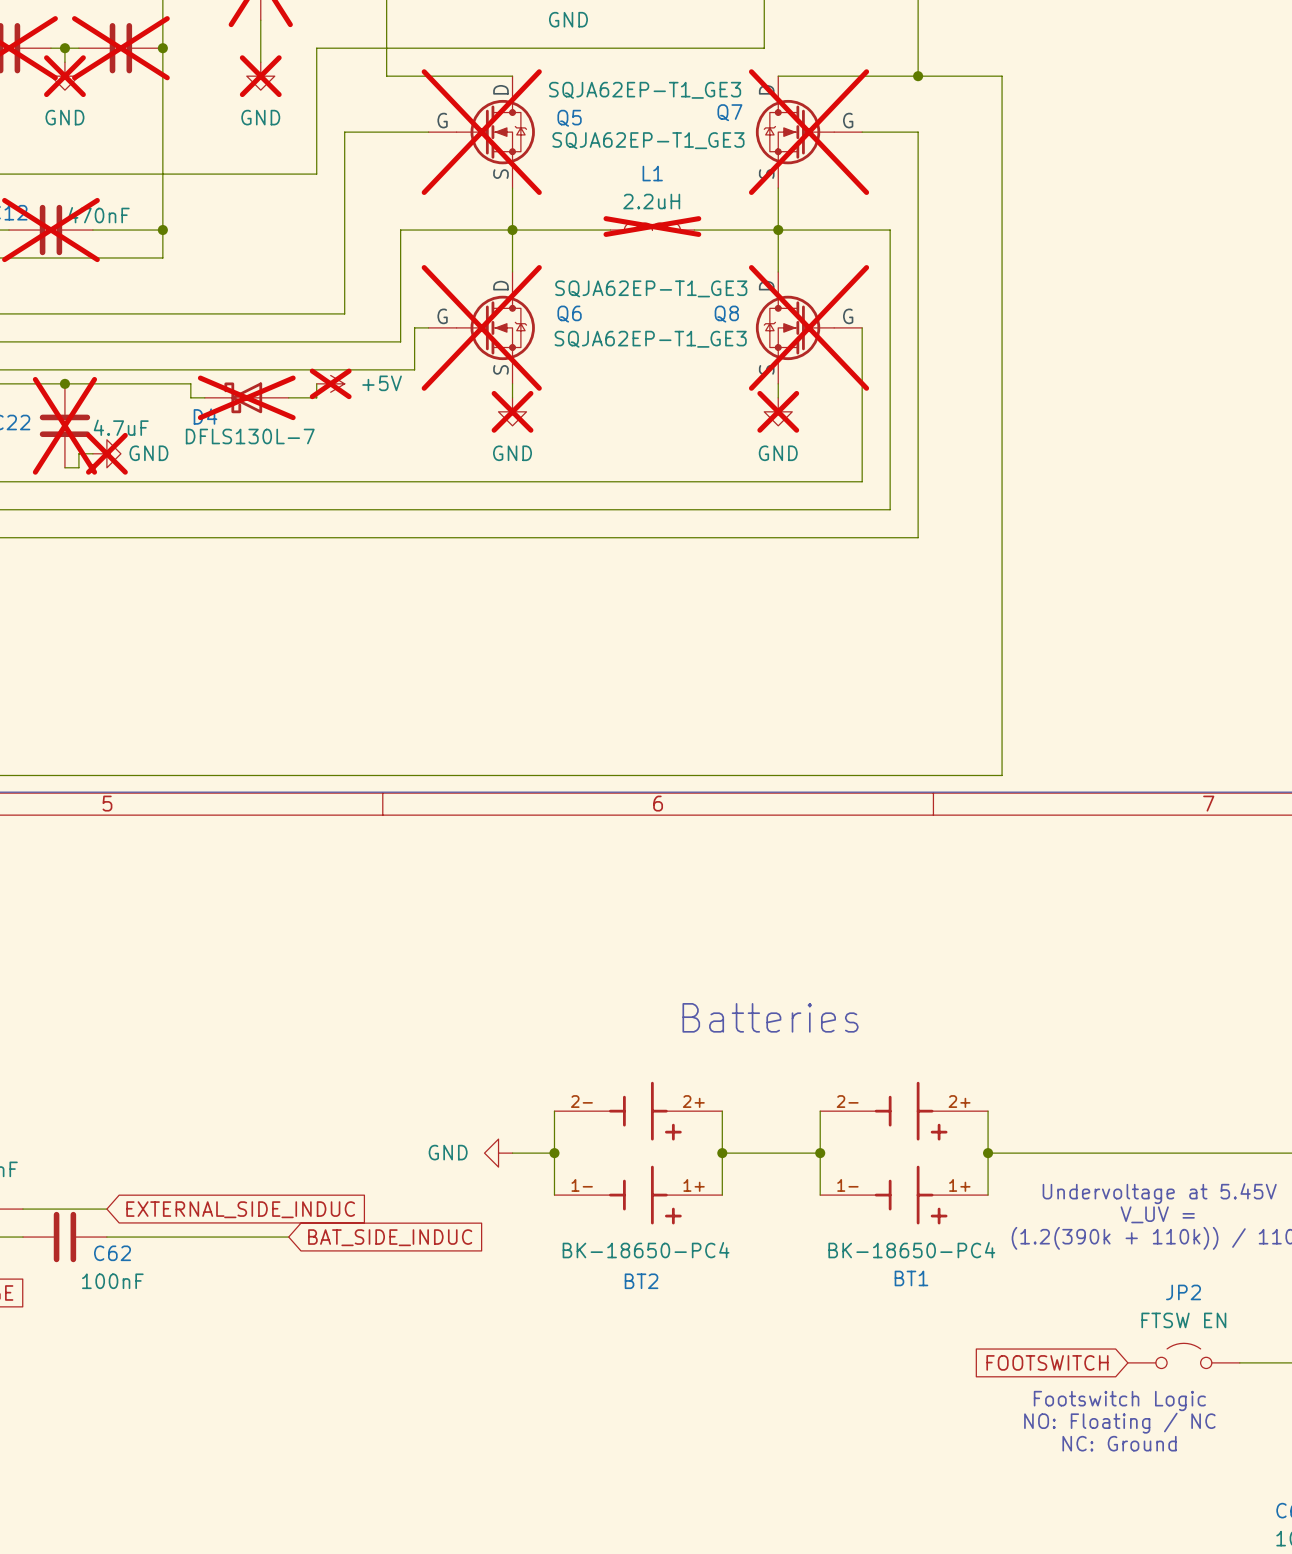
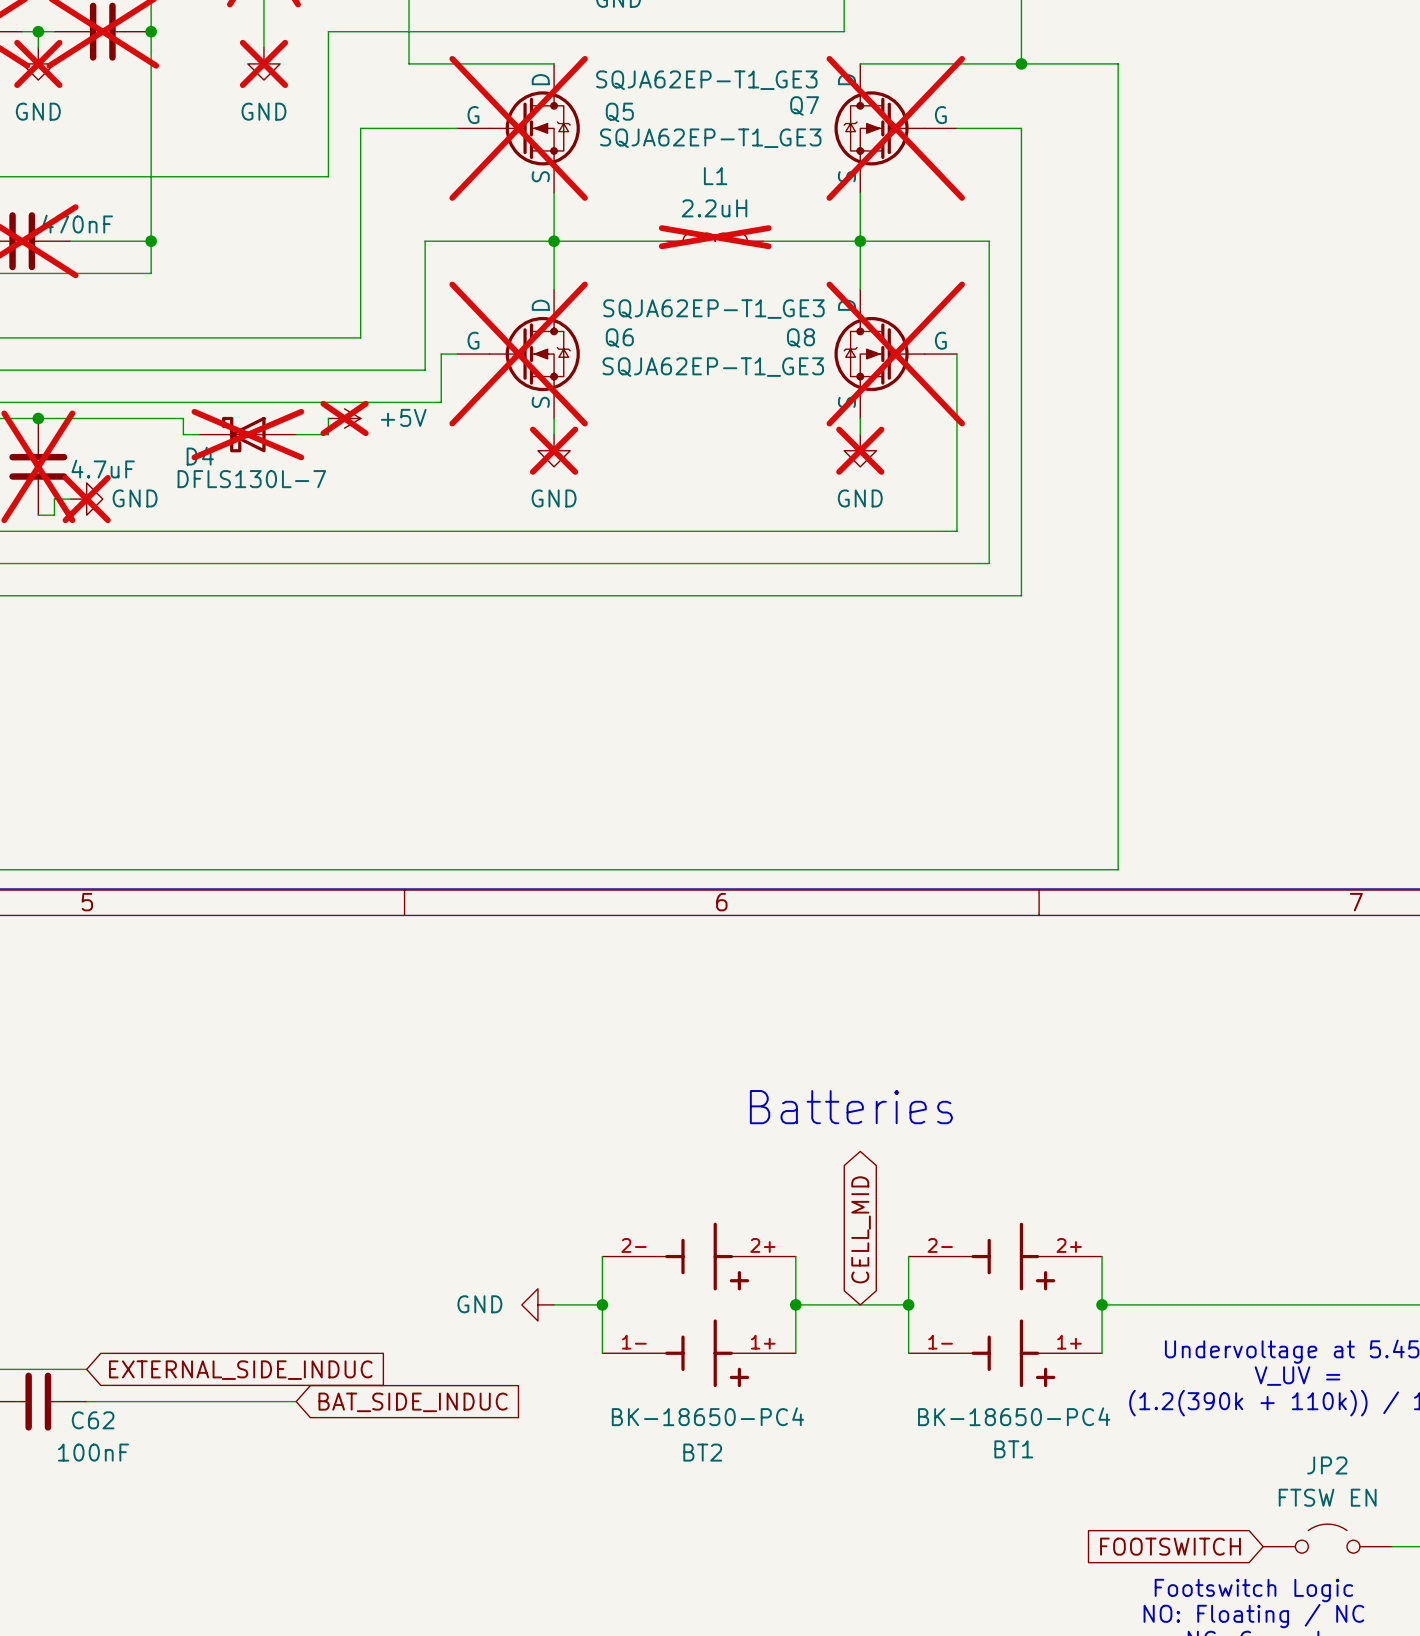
text position: Batteries (770, 1017) -> Batteries (851, 1107)
global label: none -> CELL_MID (861, 1229)

